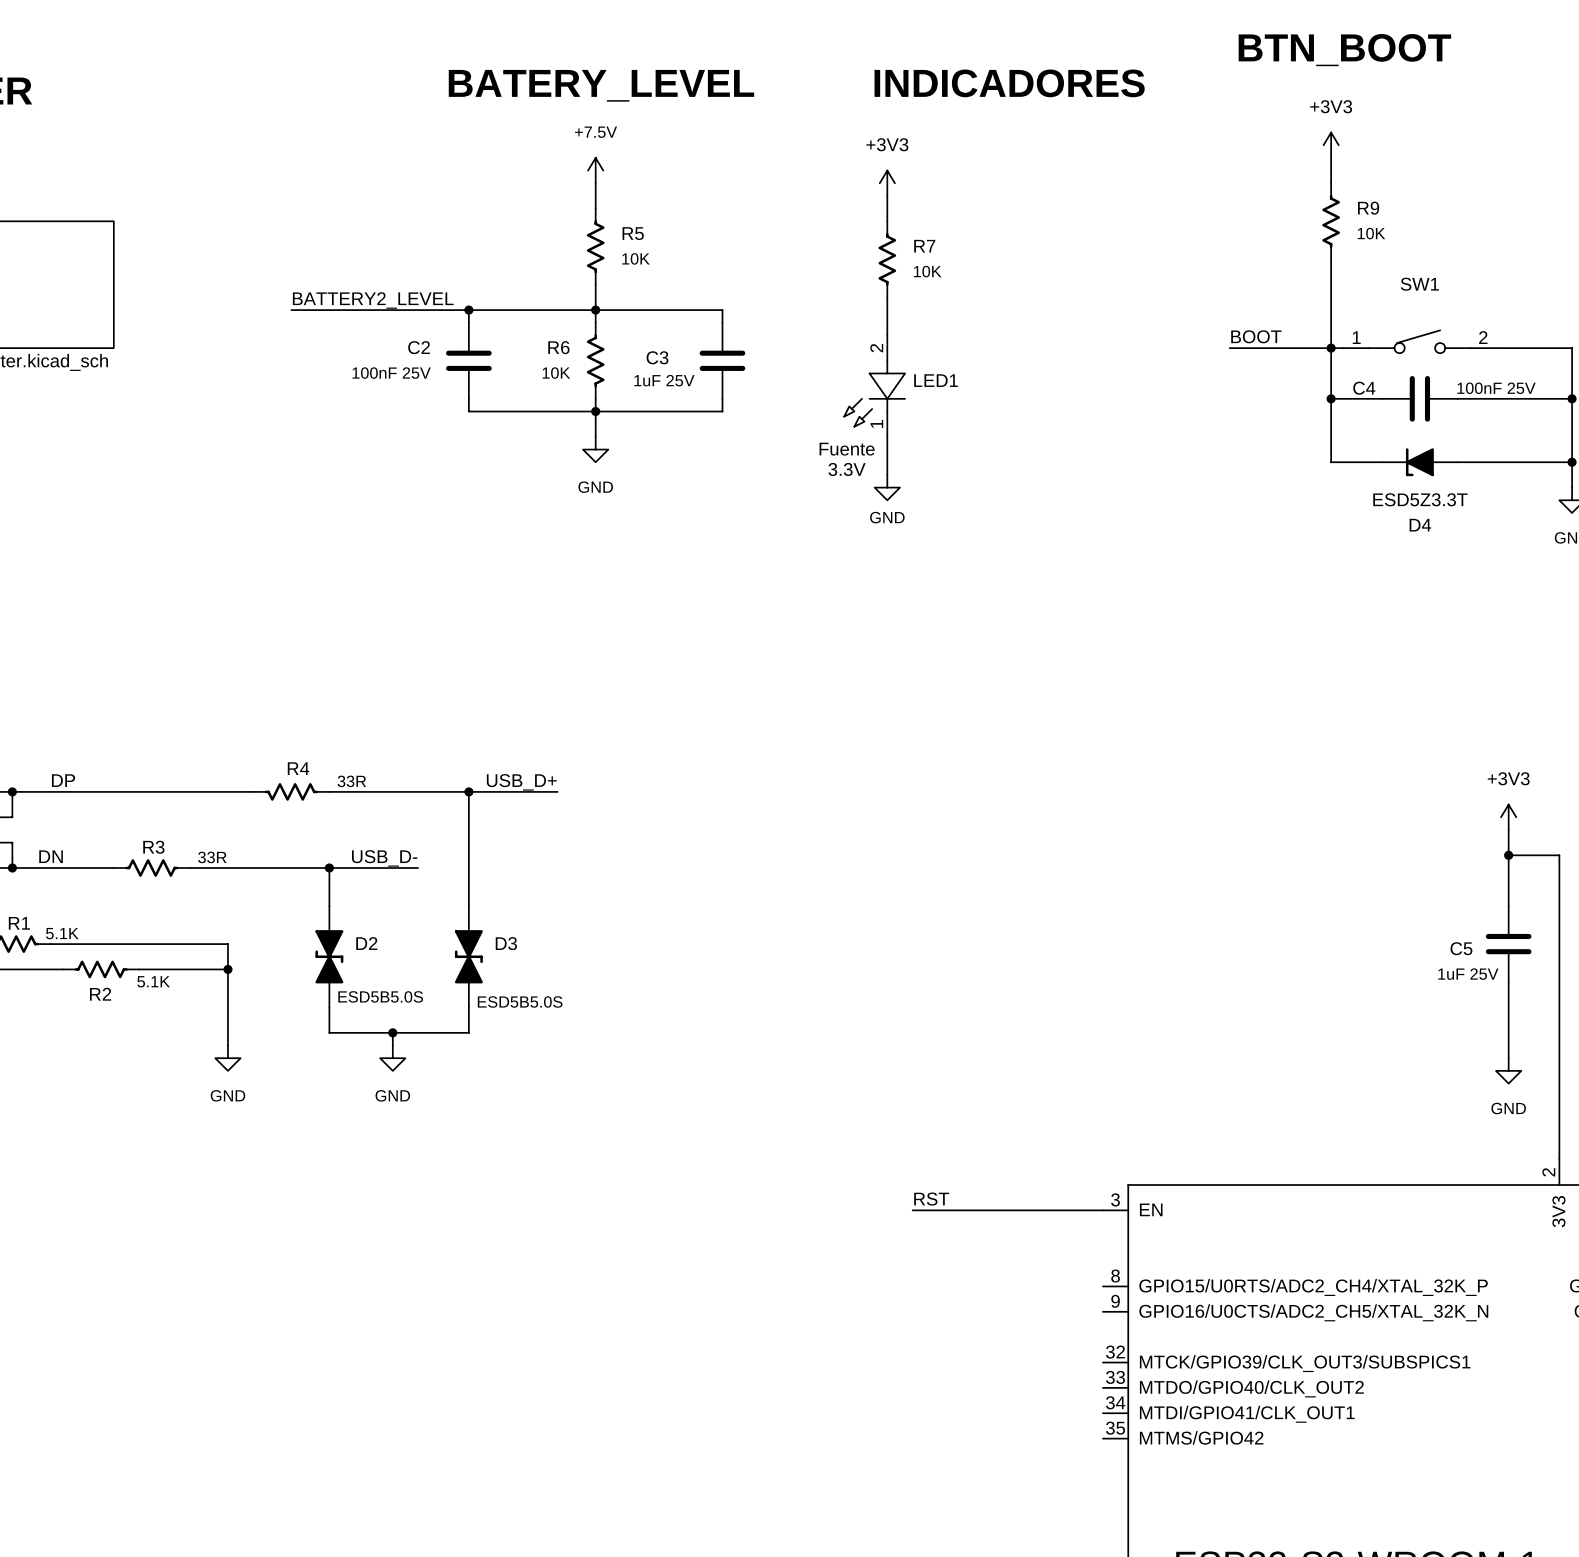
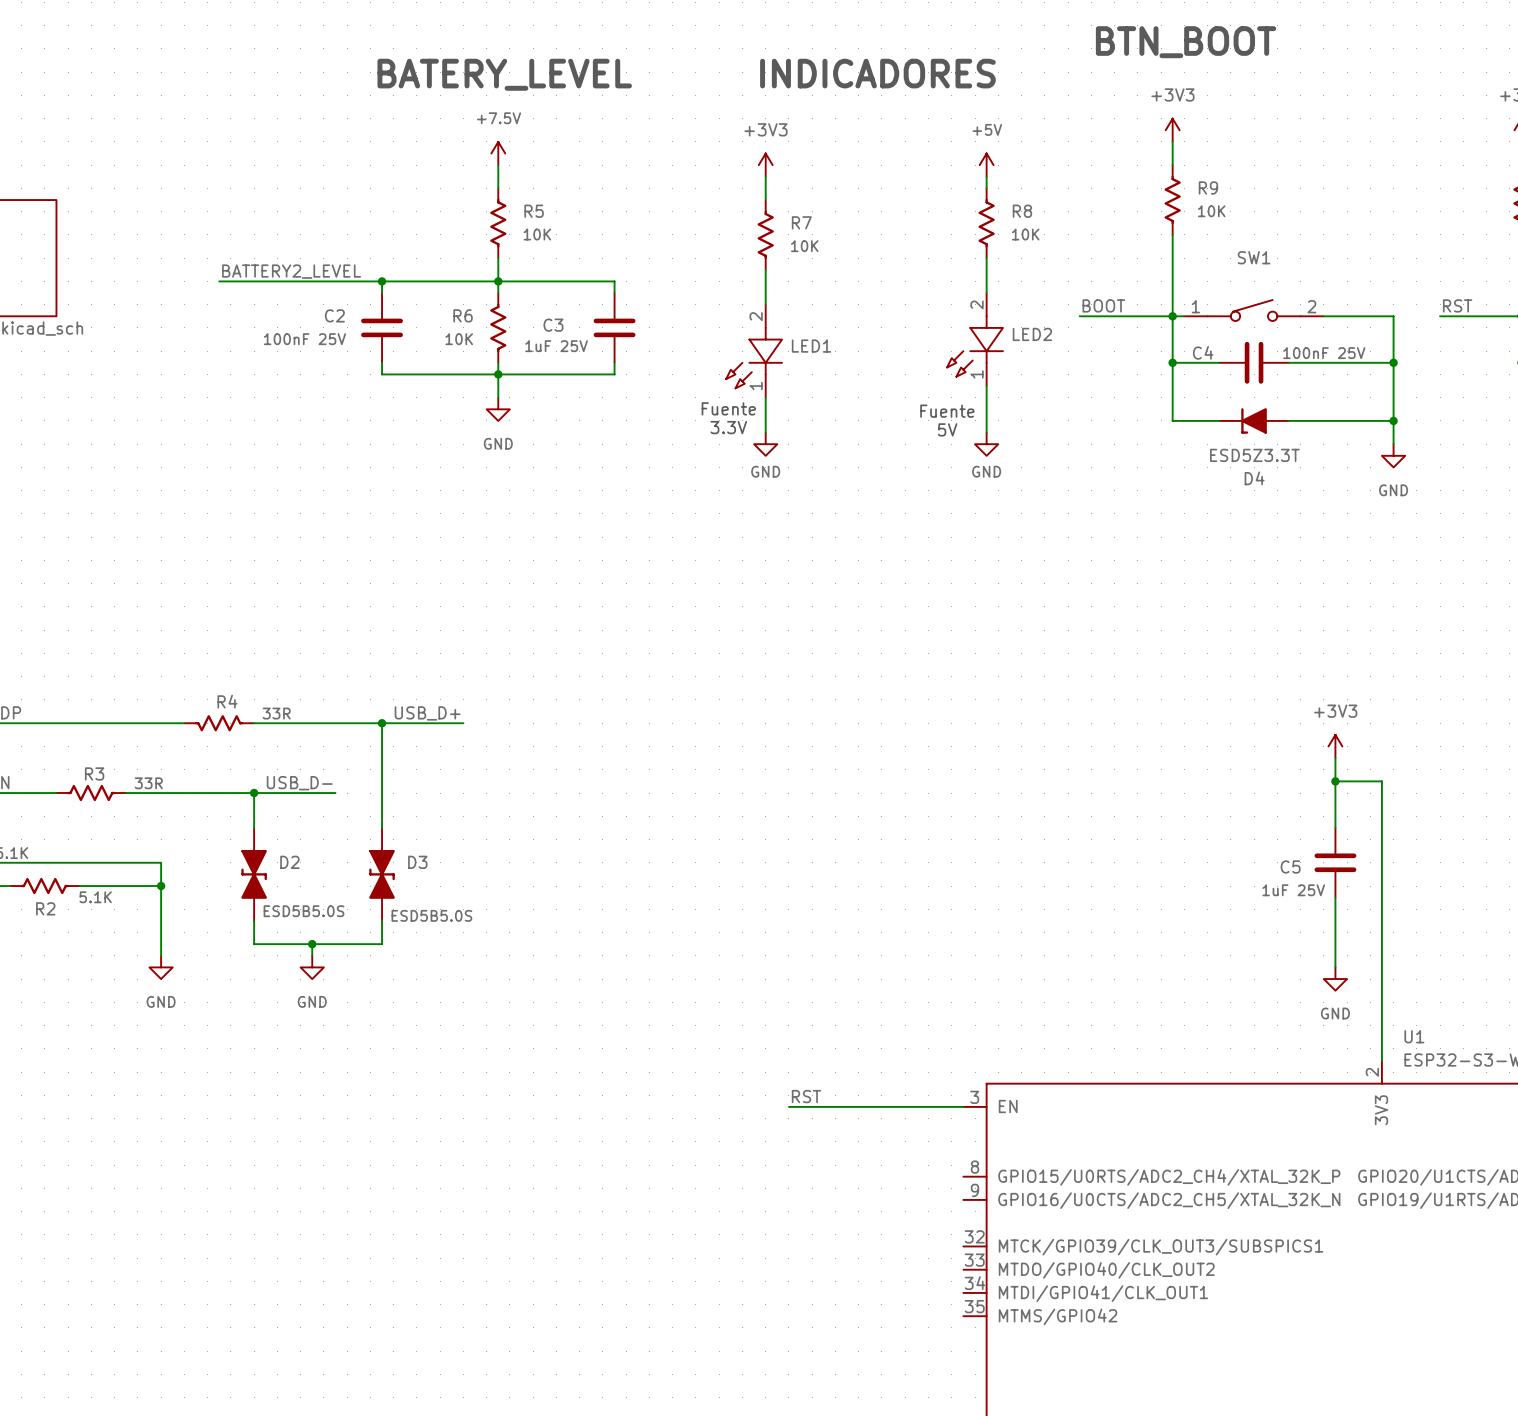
power symbol: none -> +5V (986, 165)
wire: none -> (986, 176) (986, 188)
R8: none -> 10K (986, 223)
wire: none -> (986, 258) (986, 293)
LED2: none -> (975, 339)
wire: none -> (986, 386) (986, 432)
text: none -> Fuente (947, 411)
text: none -> 5V (947, 429)
power symbol: none -> GND (986, 444)

